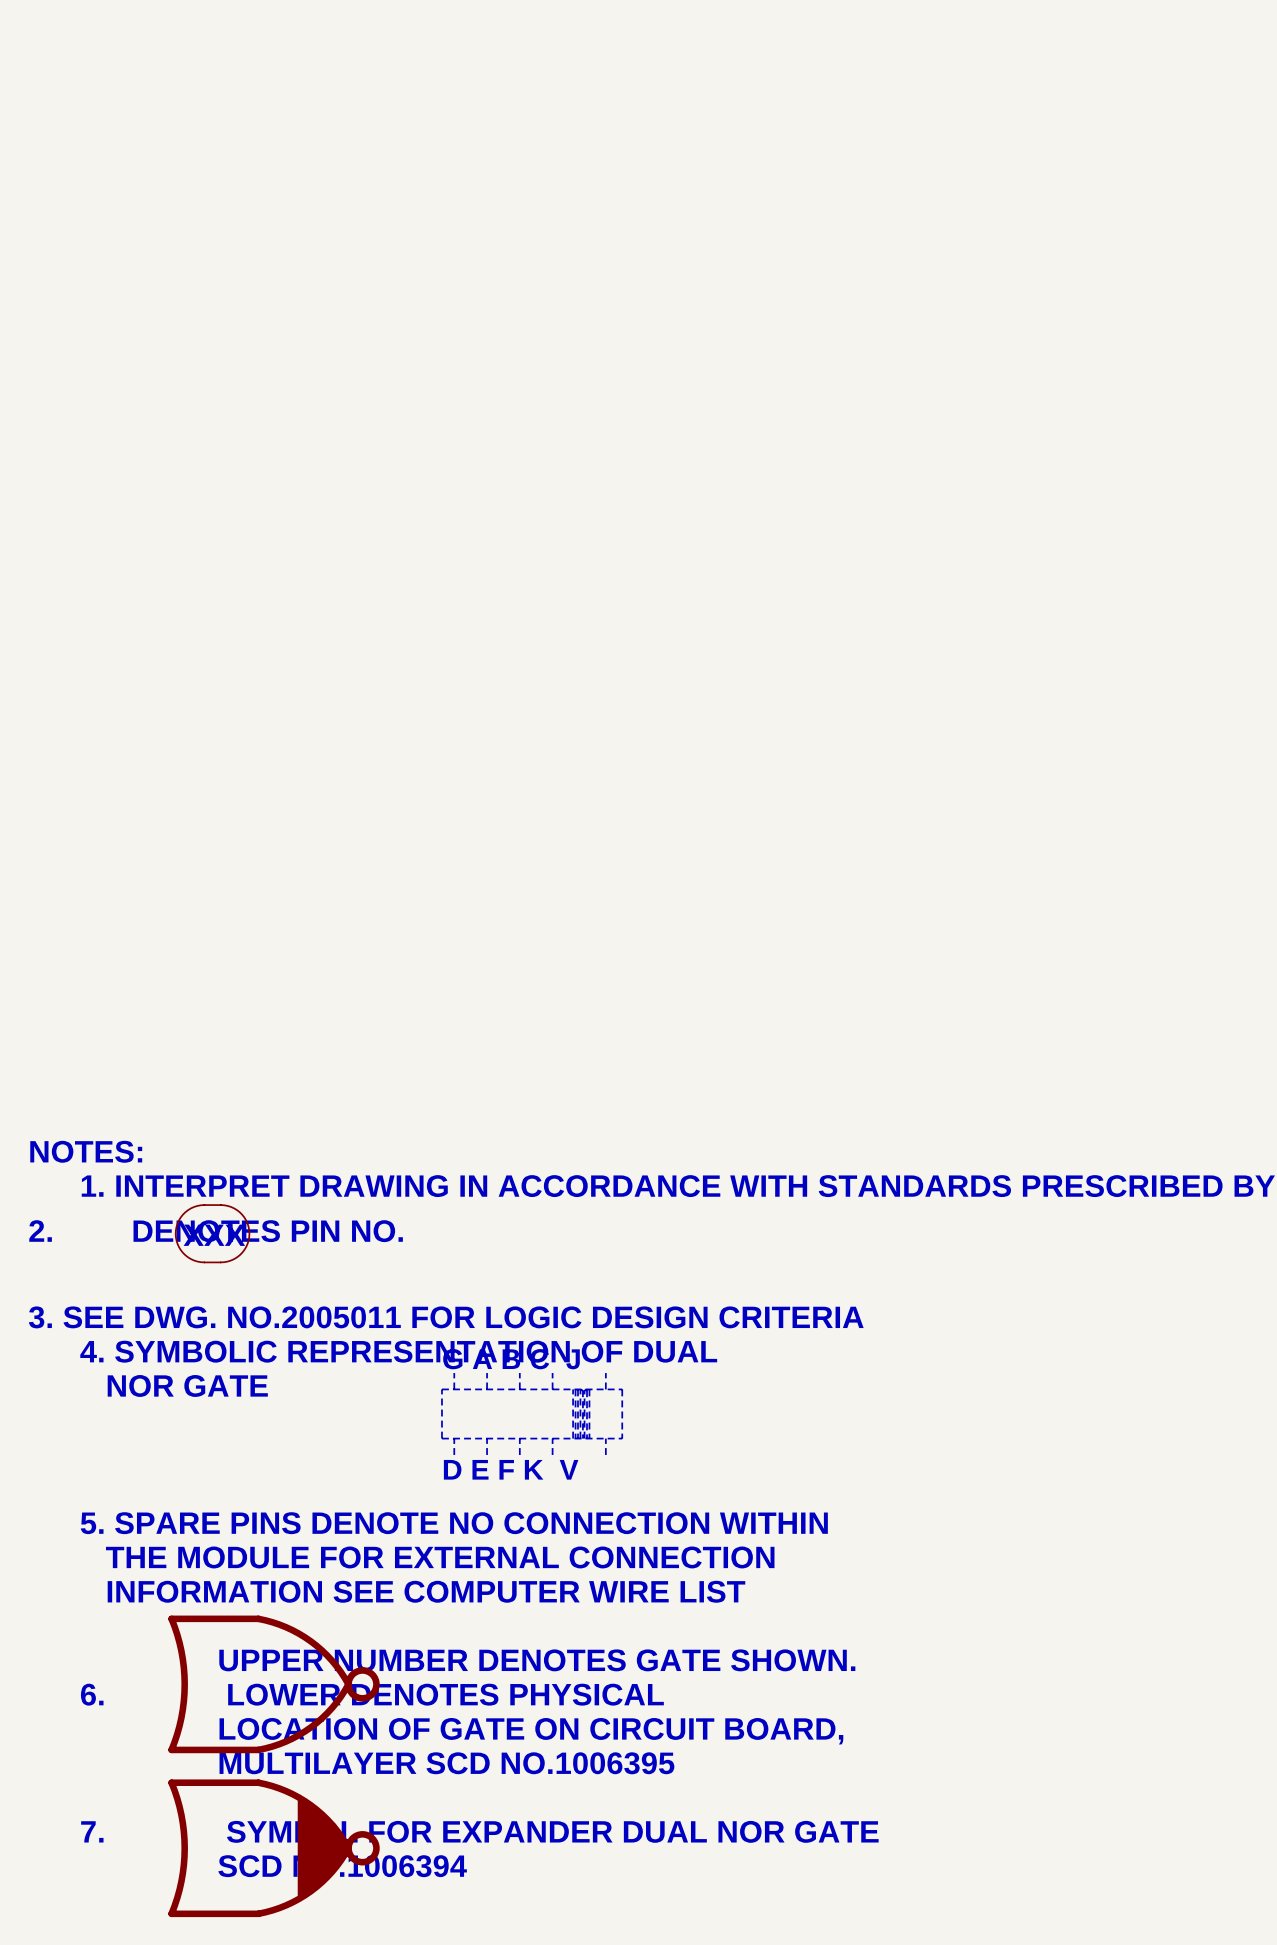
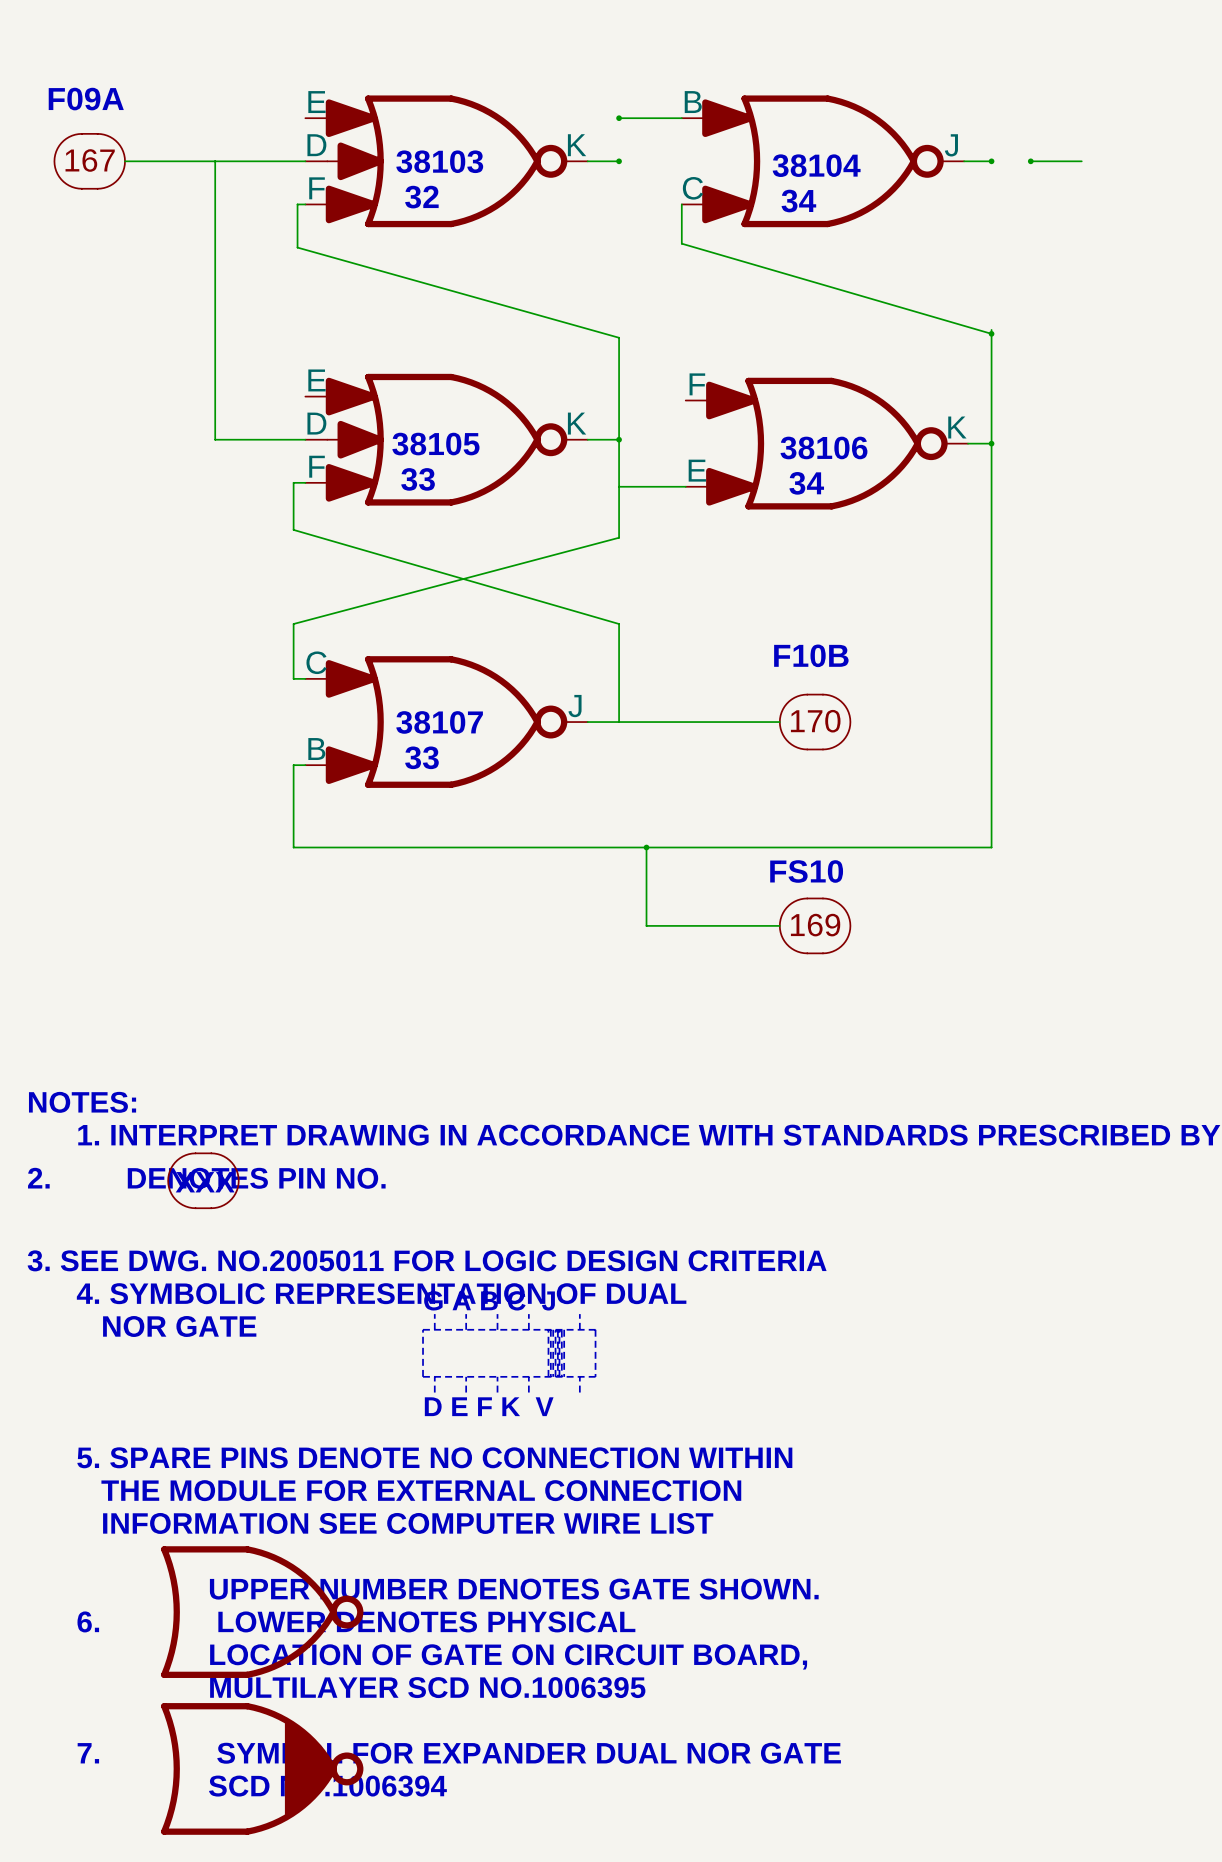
text: none -> F09A (86, 99)
wire: none -> (619, 118) (681, 118)
junction: none -> (619, 118)
part: none -> (89, 161)
wire: none -> (125, 161) (305, 161)
wire: none -> (215, 161) (215, 439) (305, 439)
part: none -> (446, 161)
wire: none -> (587, 161) (619, 161)
junction: none -> (619, 161)
part: none -> (822, 161)
wire: none -> (964, 161) (991, 161)
junction: none -> (991, 161)
wire: none -> (1030, 161) (1081, 161)
junction: none -> (1030, 161)
text: none -> 38103 (439, 161)
text: none -> 38104 (816, 165)
text: none -> 32 (421, 197)
text: none -> 34 (798, 201)
wire: none -> (305, 204) (297, 204) (297, 247) (619, 337) (619, 537) (293, 624) (293, 678) (305, 678)
wire: none -> (681, 204) (681, 243) (991, 333)
wire: none -> (991, 329) (991, 847) (293, 847) (293, 765) (305, 765)
junction: none -> (991, 333)
part: none -> (446, 439)
wire: none -> (587, 439) (619, 439)
junction: none -> (619, 439)
text: none -> 38105 (435, 444)
part: none -> (826, 443)
wire: none -> (968, 443) (991, 443)
junction: none -> (991, 443)
text: none -> 38106 (823, 447)
text: none -> 33 (418, 479)
wire: none -> (305, 482) (293, 482) (293, 529) (619, 624) (619, 722)
text: none -> 34 (806, 483)
wire: none -> (619, 486) (685, 486)
text: none -> F10B (811, 655)
text: none -> 38107 (439, 722)
part: none -> (446, 722)
wire: none -> (587, 722) (779, 722)
part: none -> (815, 722)
text: none -> 33 (421, 757)
wire: none -> (646, 847) (646, 925) (779, 925)
junction: none -> (646, 847)
text: none -> FS10 (806, 871)
part: none -> (815, 925)

